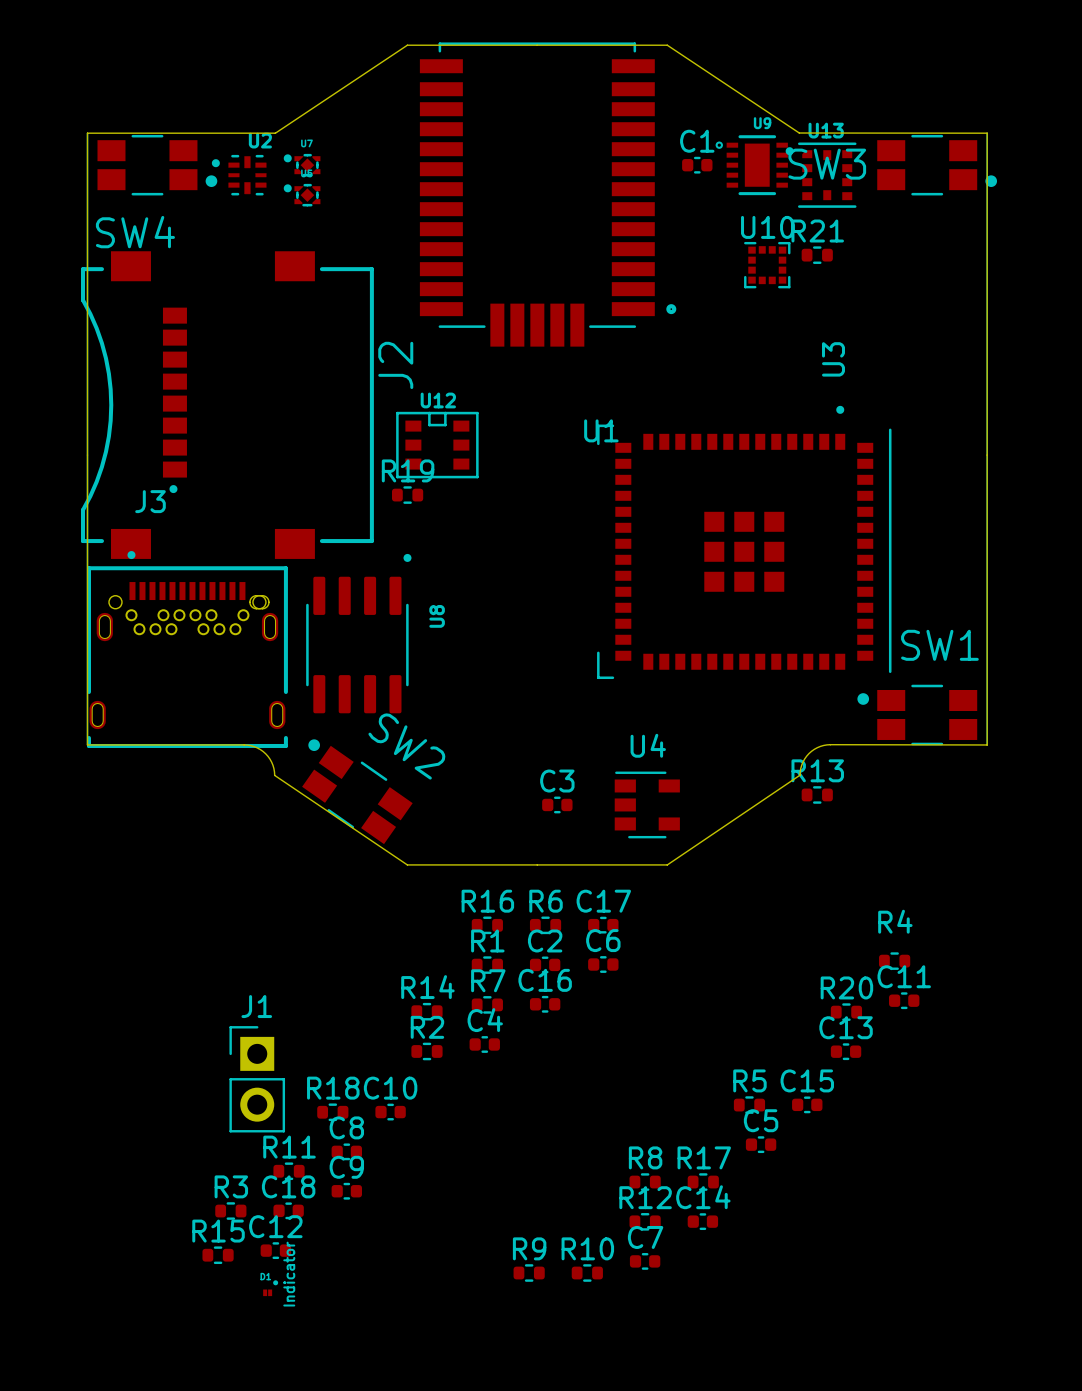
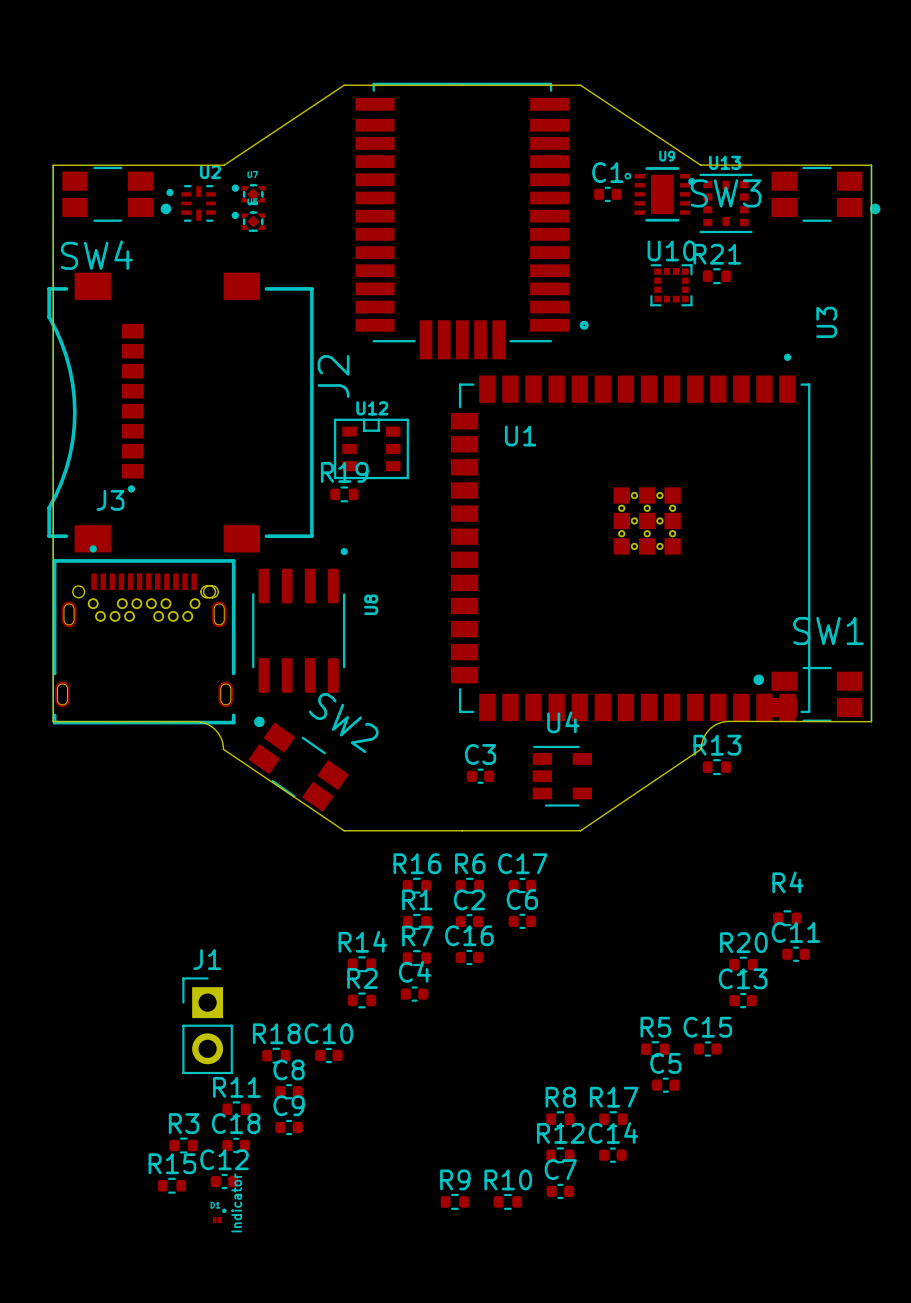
U3 name position: U3 (833, 359) -> U3 (826, 322)
U3 footprint: [597, 405, 892, 680] -> [450, 353, 811, 721]

